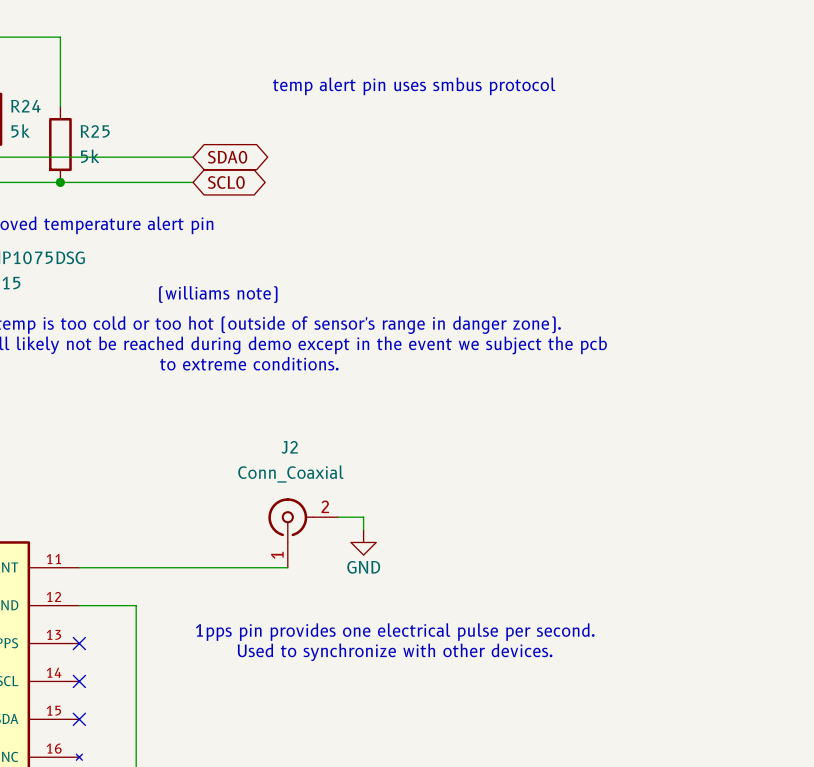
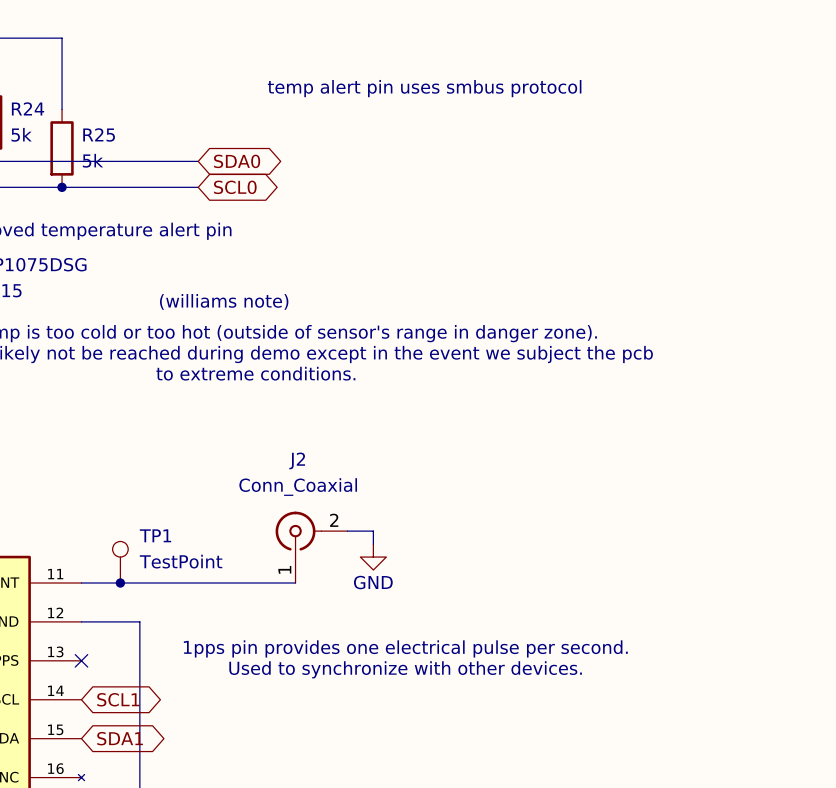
TP1: none -> TestPoint (120, 562)
junction: none -> (120, 583)
no-connect mark: (79, 681) -> none
global label: none -> SCL1 (118, 699)
no-connect mark: (79, 719) -> none
global label: none -> SDA1 (120, 738)

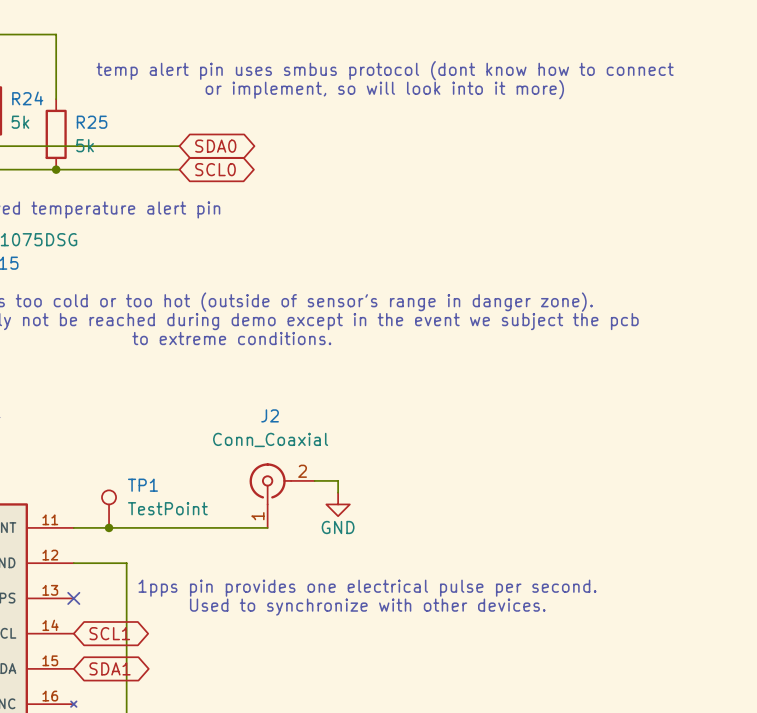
text: temp alert pin uses smbus protocol (424, 88) -> temp alert pin uses smbus protocol (dont know how to connect (385, 70)
text: none -> or implement, so will look into it more) (384, 89)
text: (williams note) (224, 301) -> none

